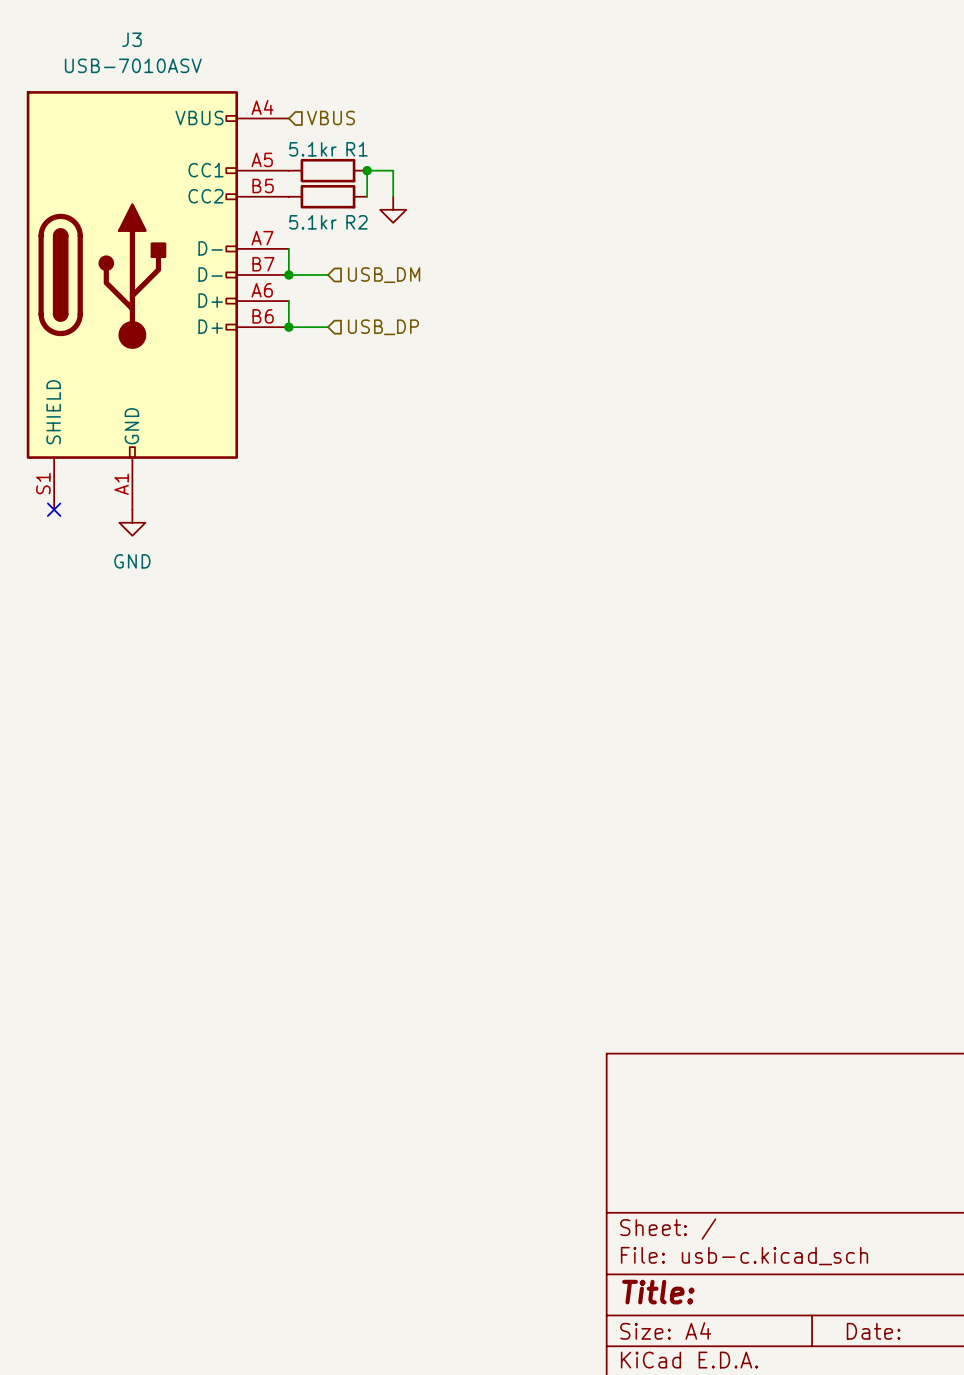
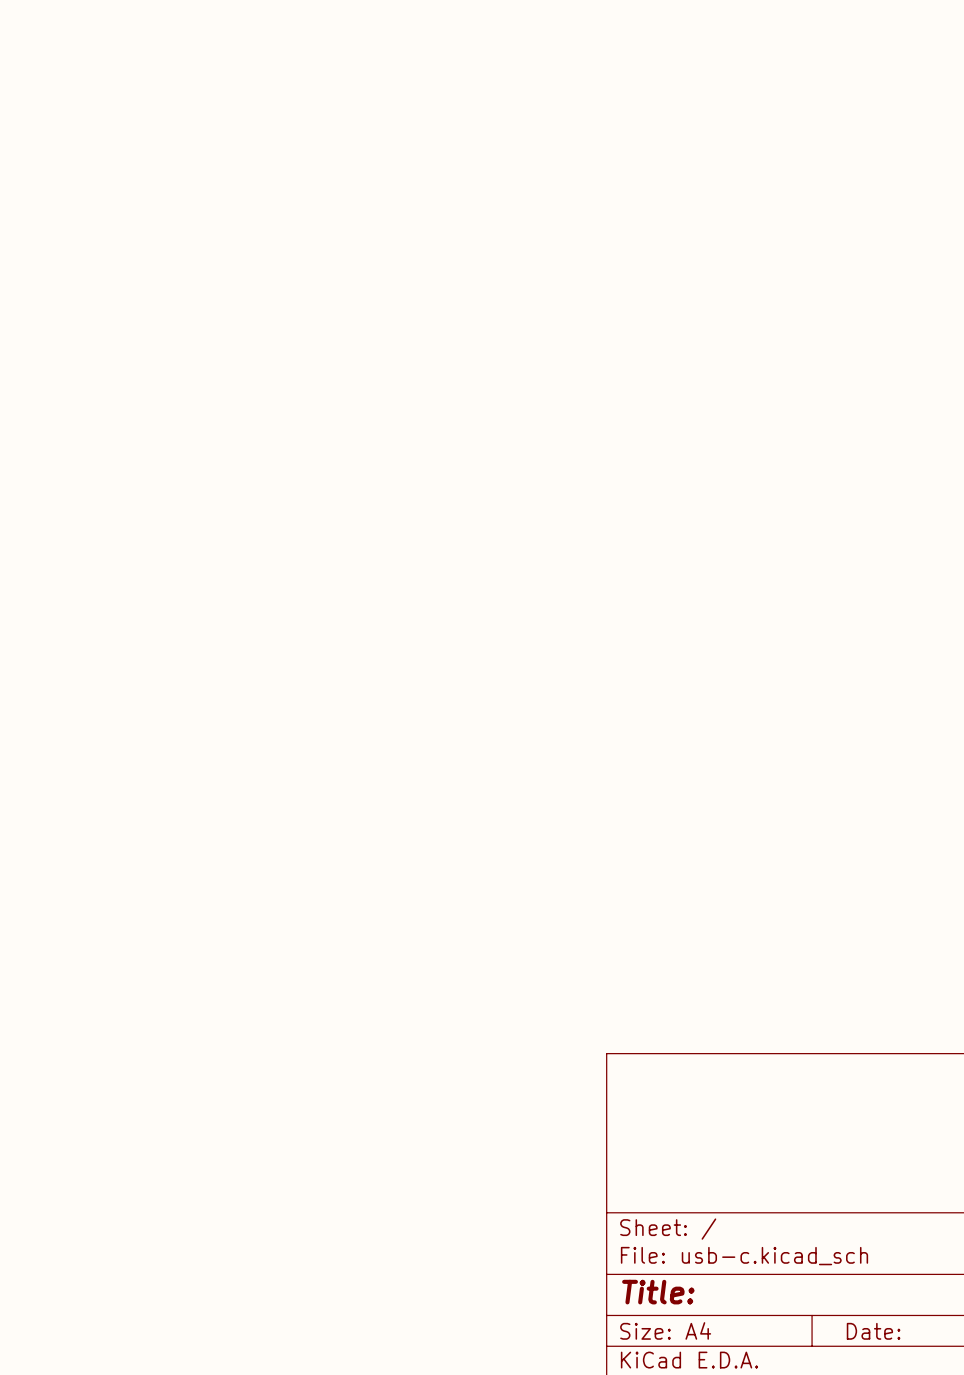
hierarchical label: VBUS (330, 118) -> none
R1: 5.1kr (327, 170) -> none
junction: (367, 170) -> none
R2: 5.1kr (327, 196) -> none
wire: (367, 196) (367, 170) (393, 170) (393, 196) -> none
power symbol: (393, 209) -> none
wire: (288, 248) (288, 274) (327, 274) -> none
junction: (288, 274) -> none
hierarchical label: USB_DM (384, 275) -> none
J3: USB-7010ASV (157, 300) -> none
wire: (288, 301) (288, 327) (327, 327) -> none
junction: (288, 327) -> none
hierarchical label: USB_DP (383, 327) -> none
no-connect mark: (54, 509) -> none
power symbol: GND (132, 522) -> none

